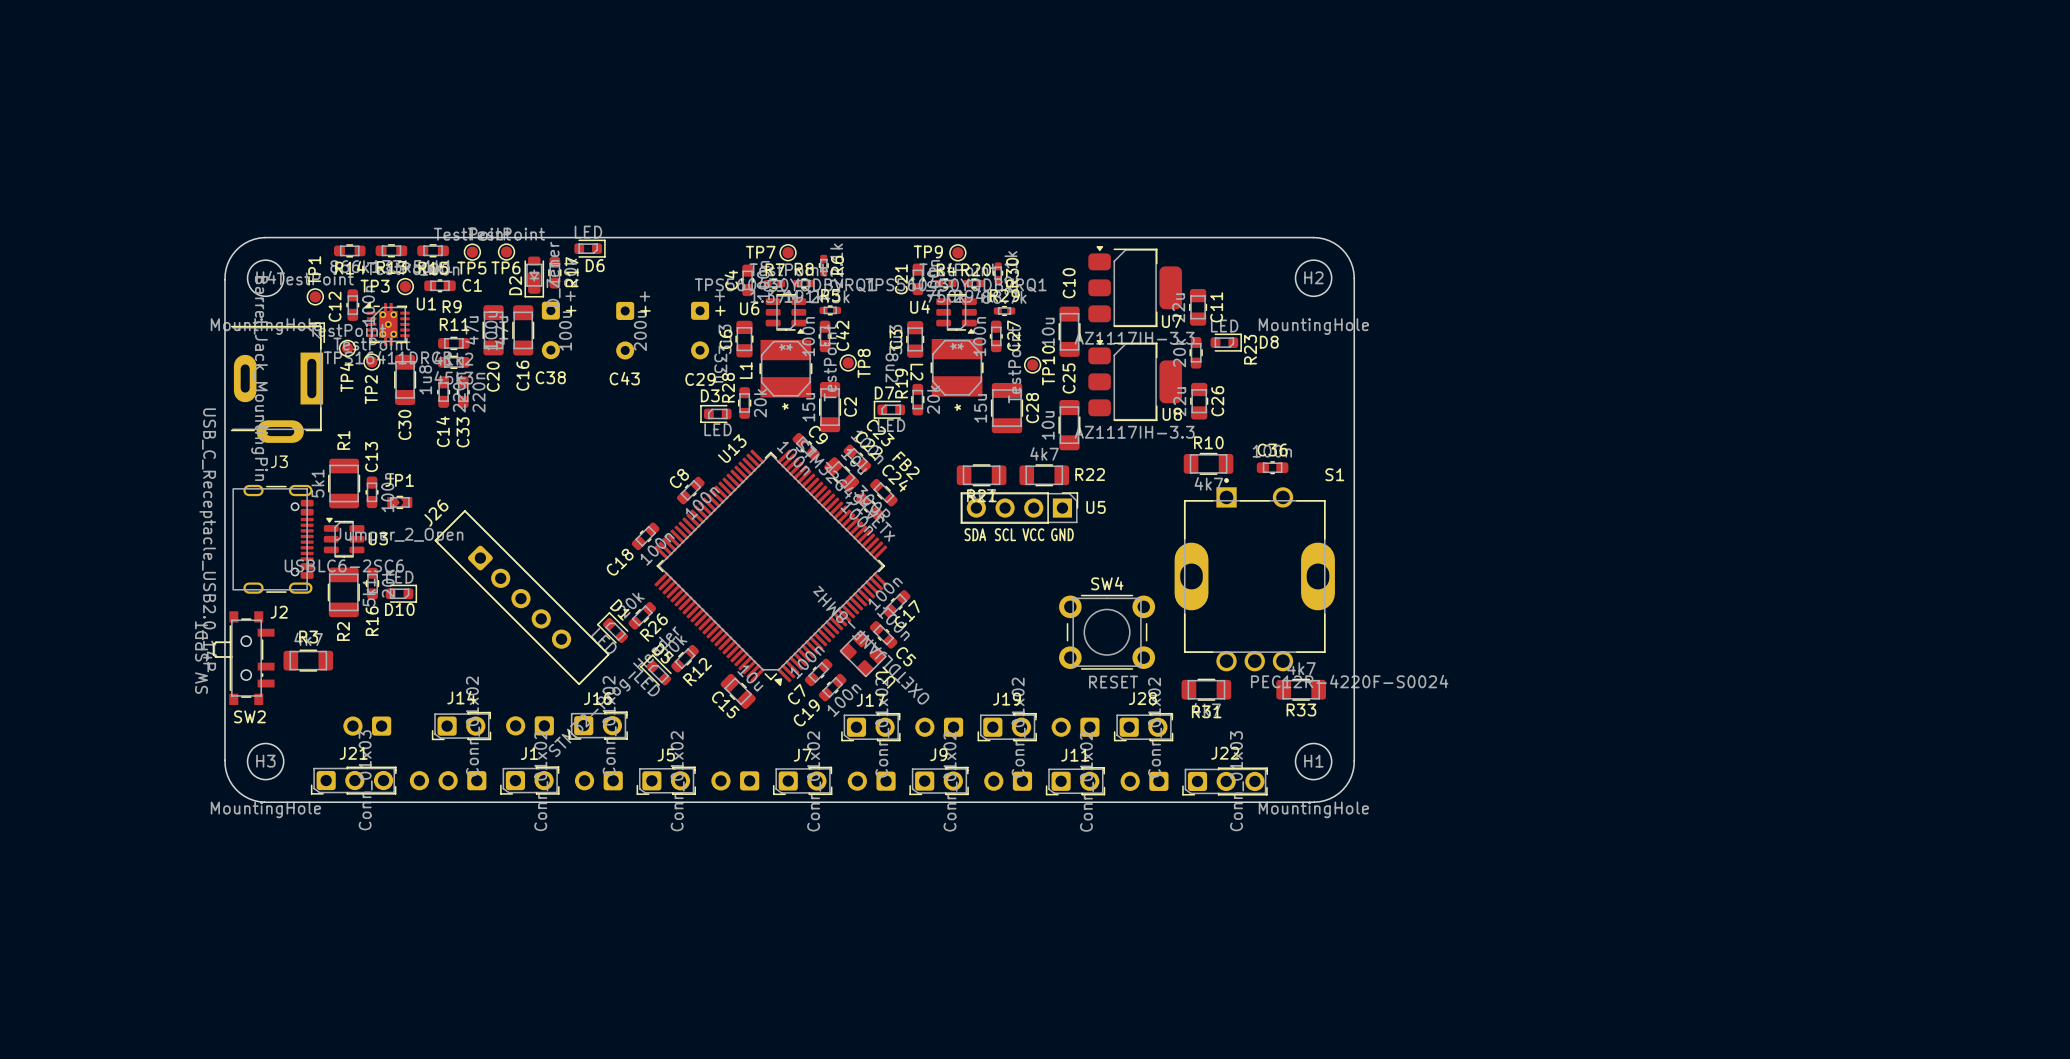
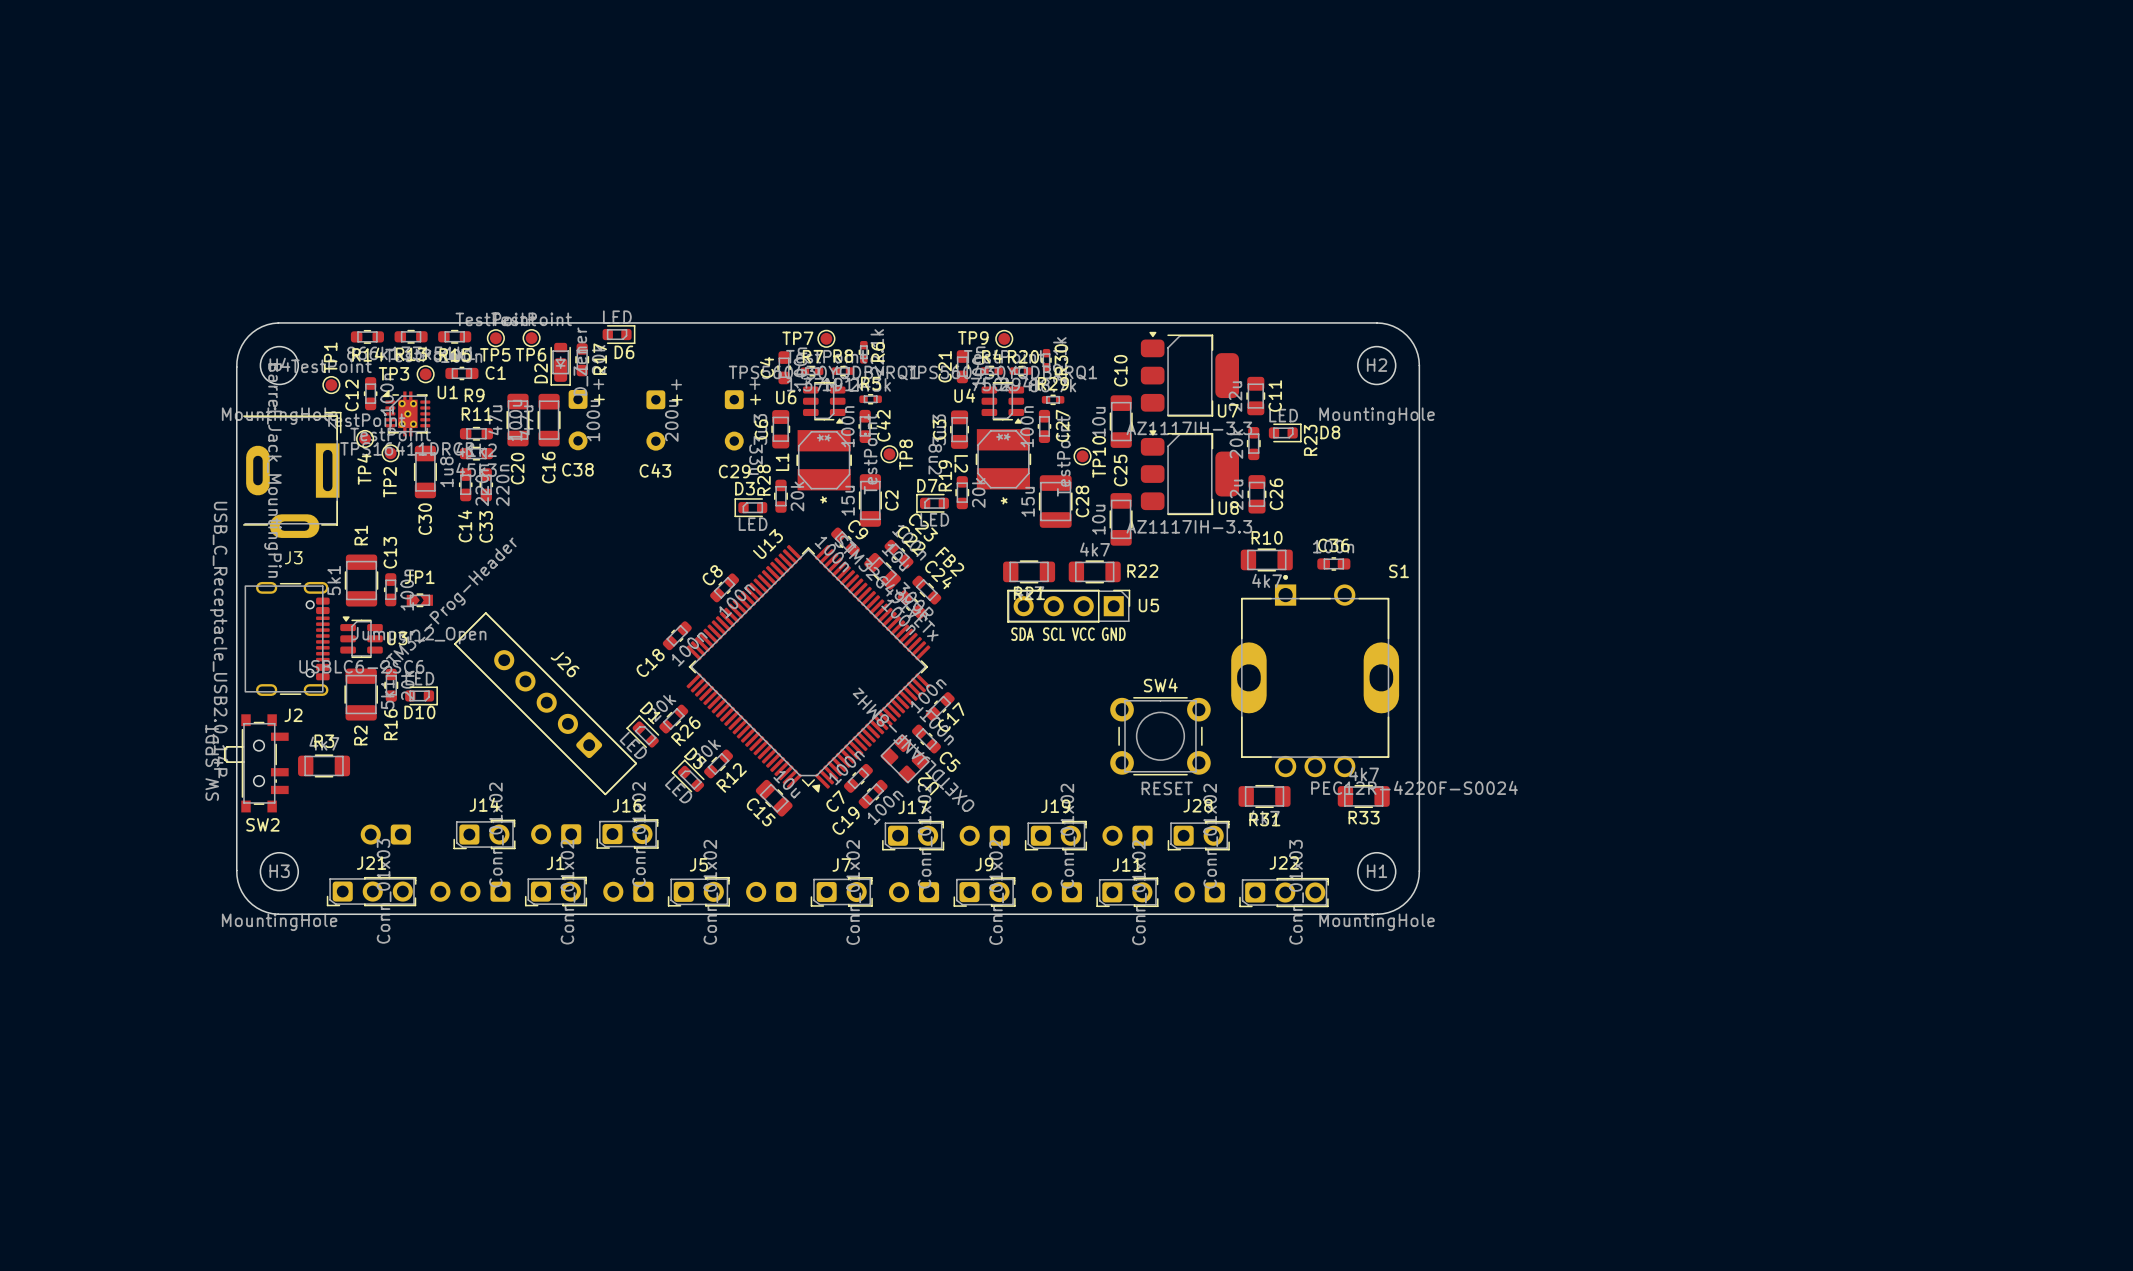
J26 name position: J26 (436, 513) -> J26 (565, 664)
J26 rotation: 0° (522, 597) -> 180° (545, 703)

